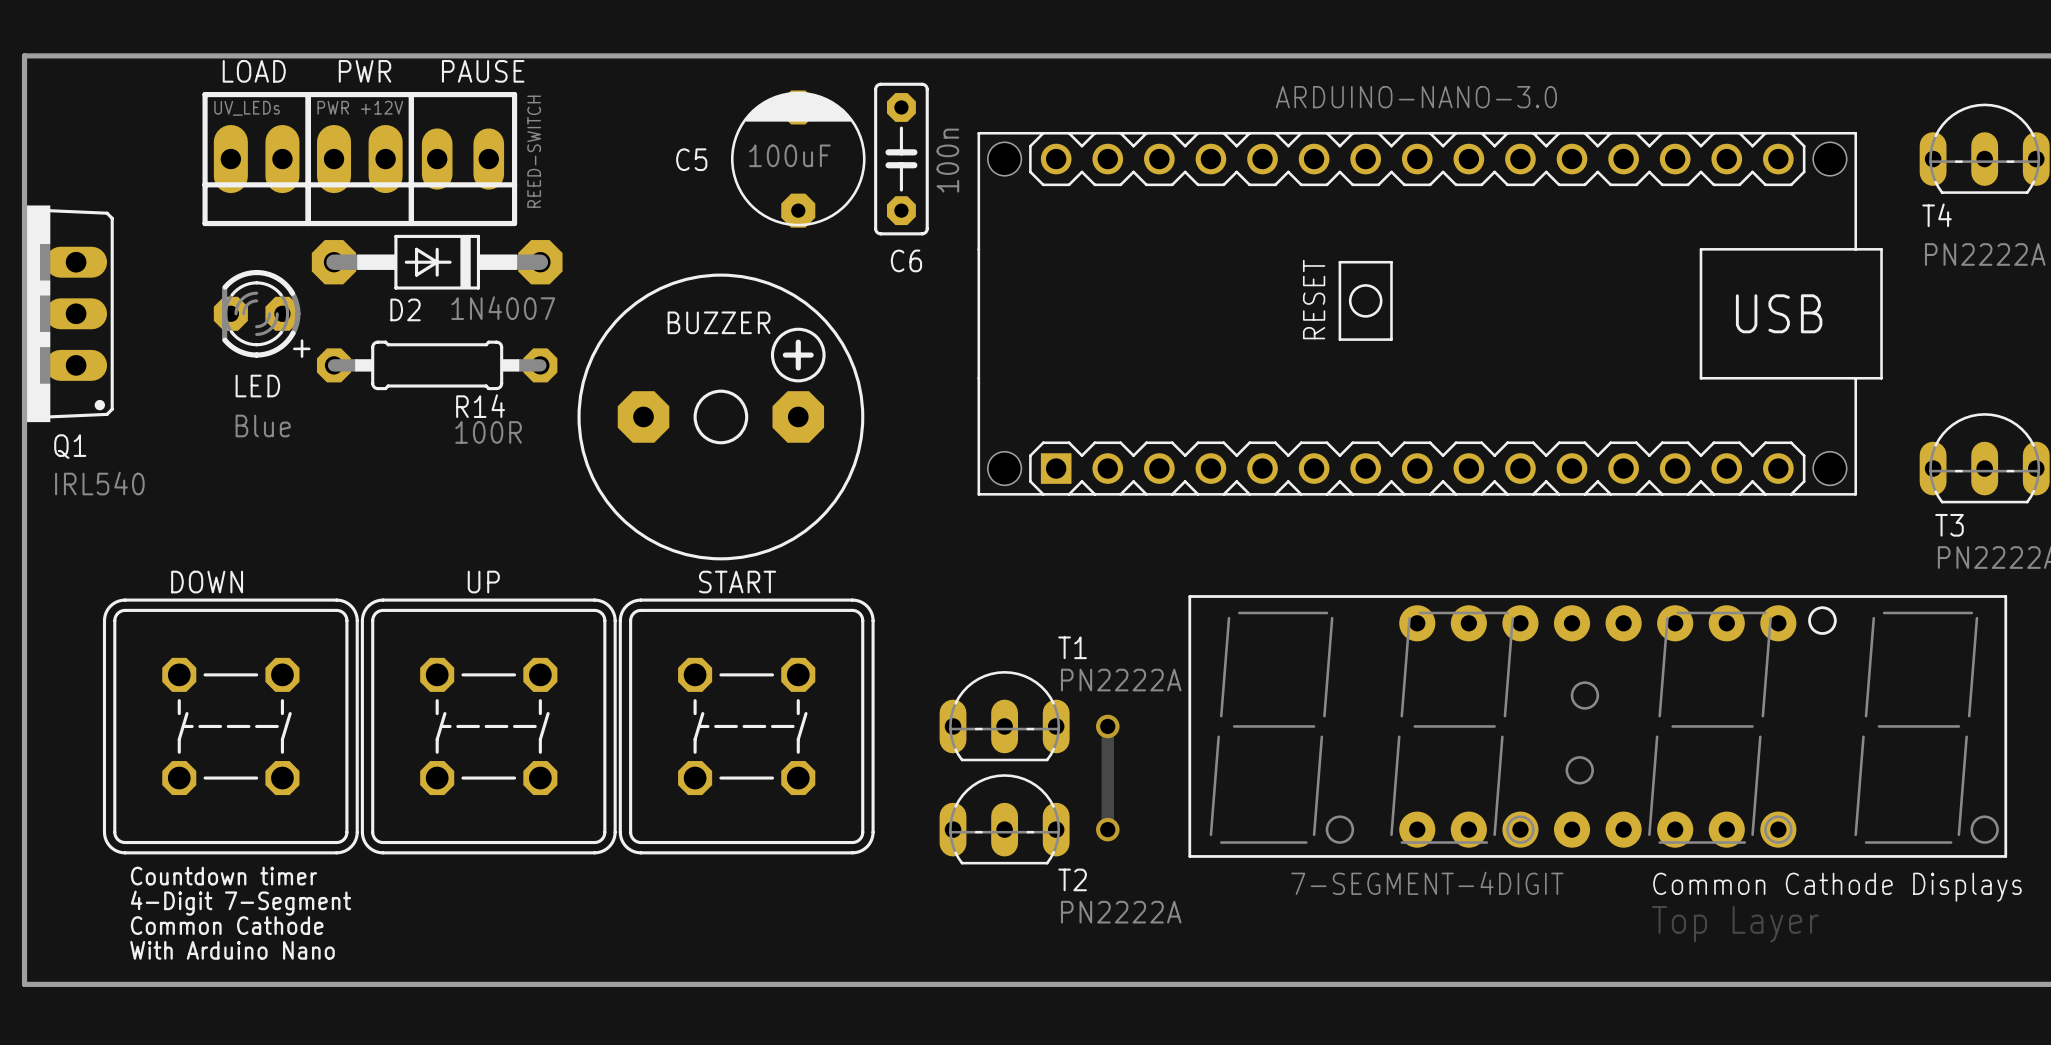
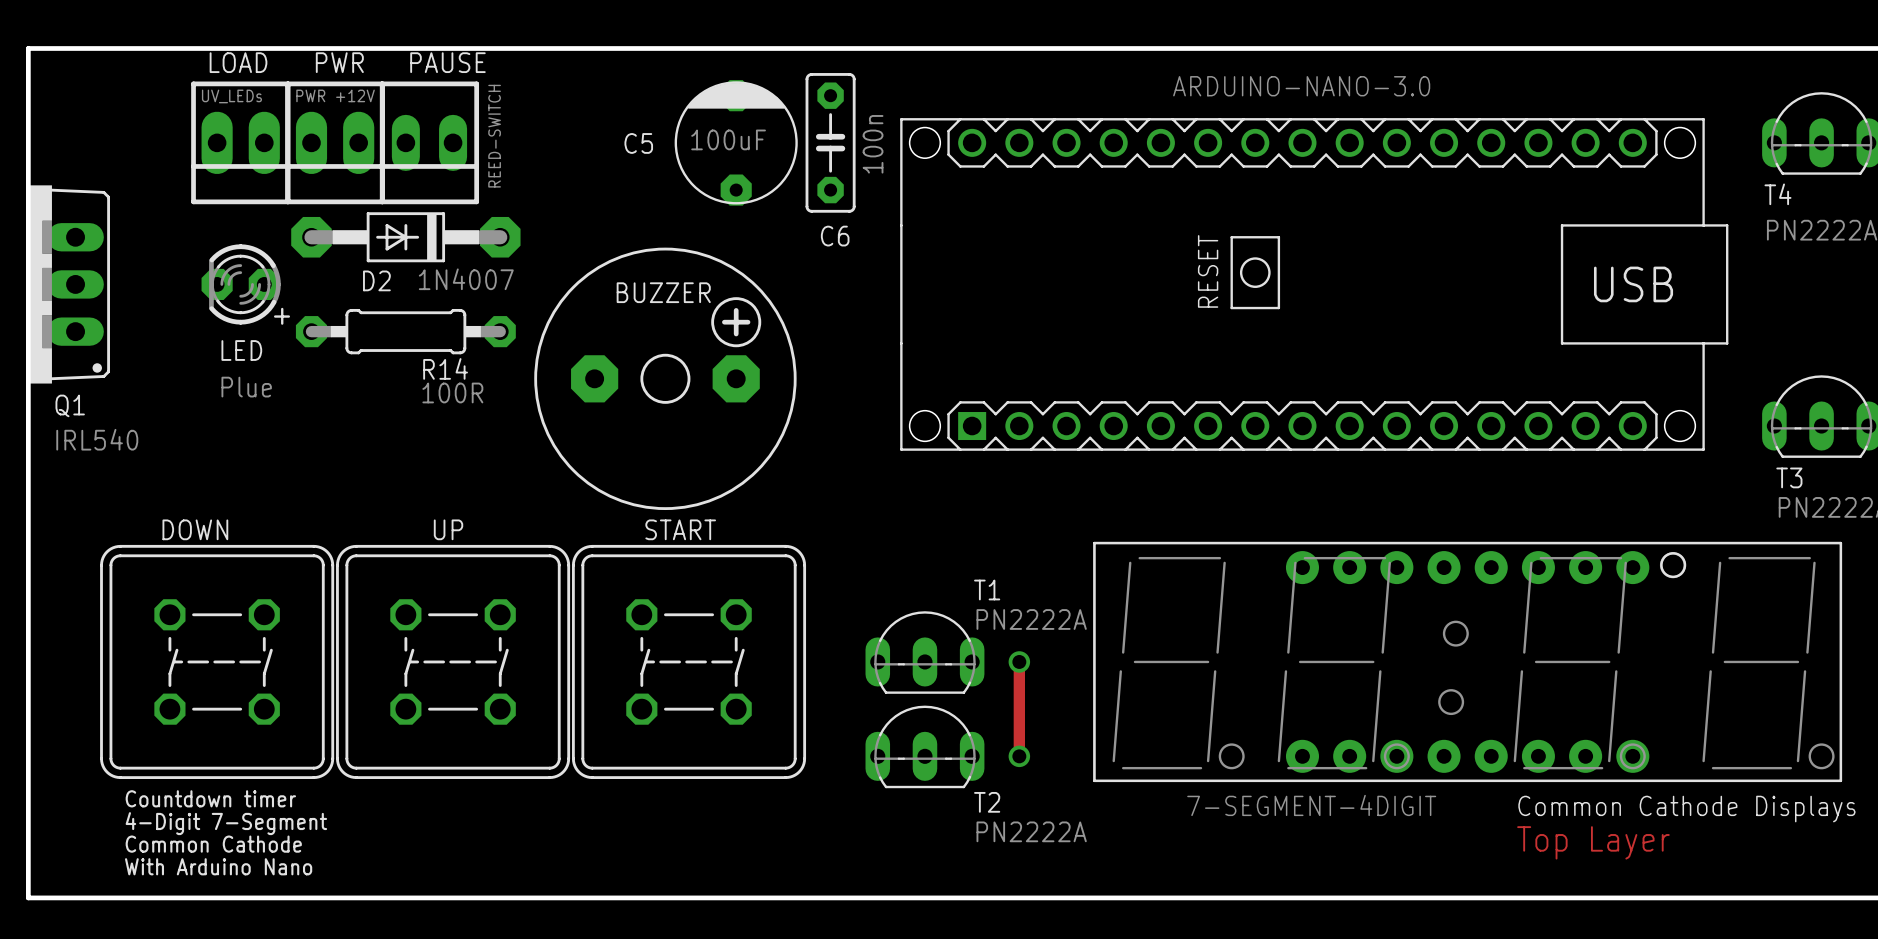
LED value: Blue (263, 425) -> Plue (246, 387)

